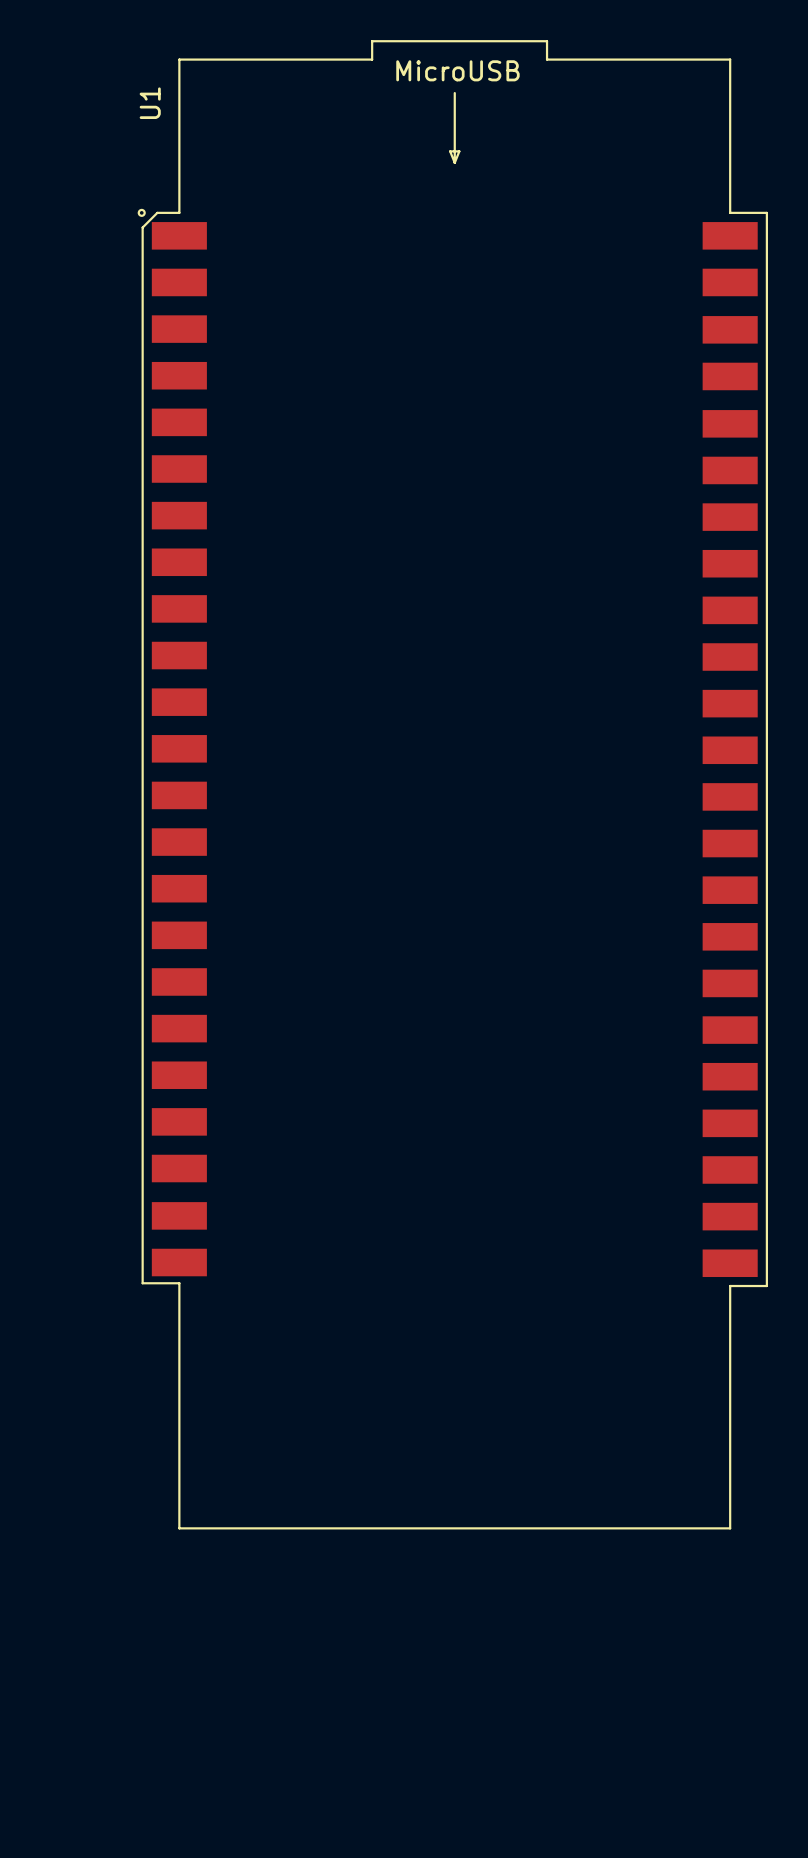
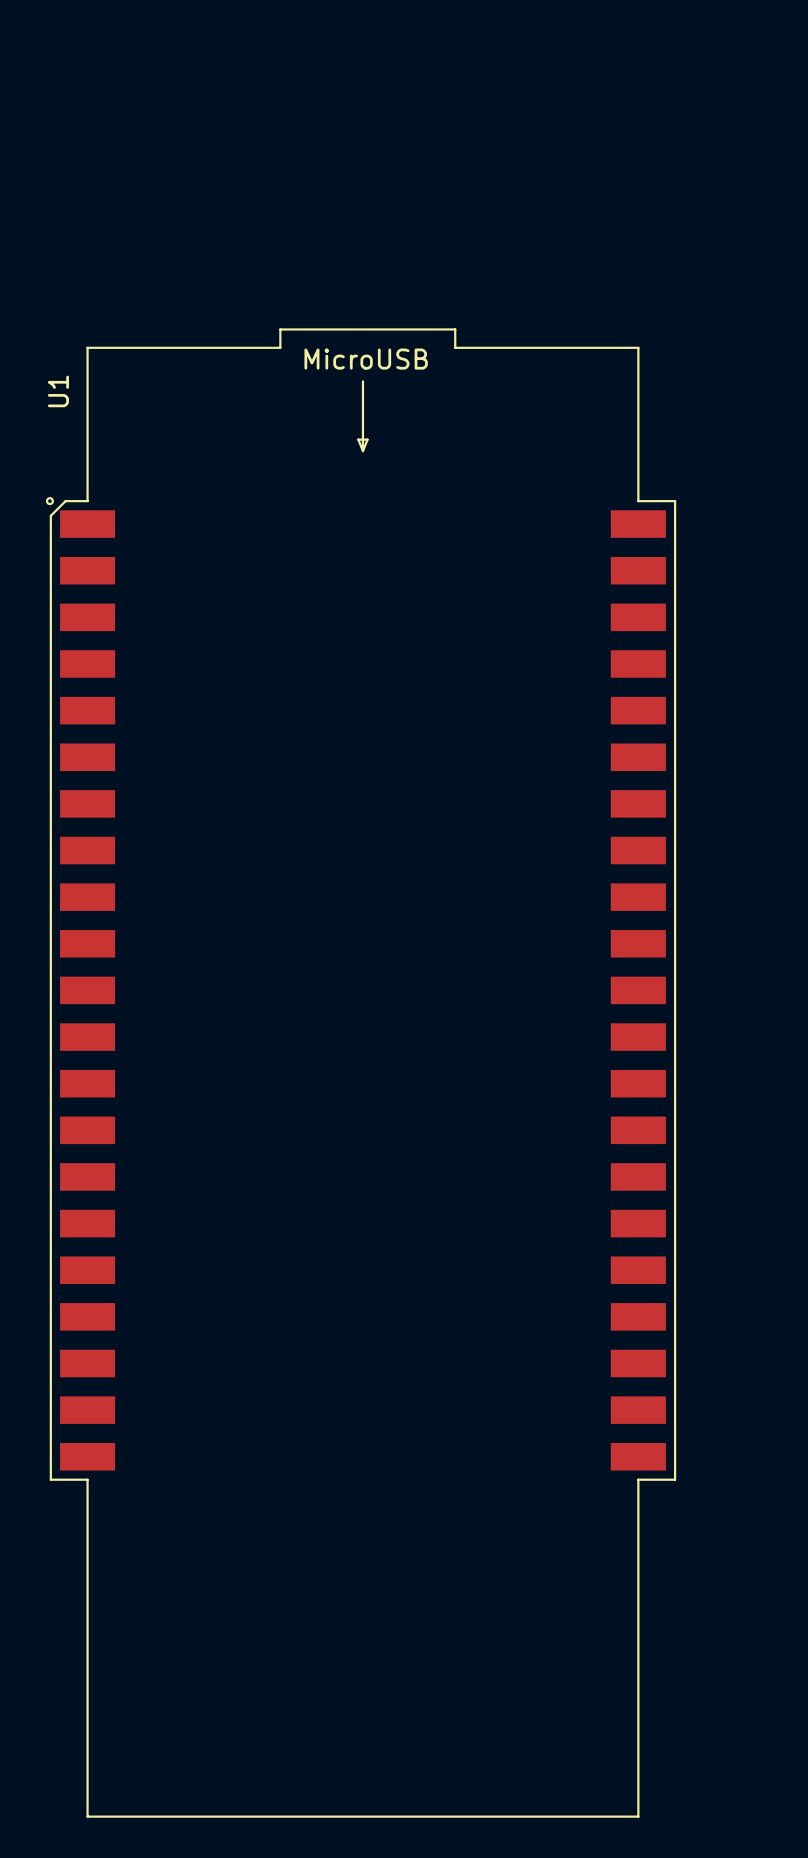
U1 footprint: [137, 40, 768, 1530] -> [45, 328, 677, 1818]

